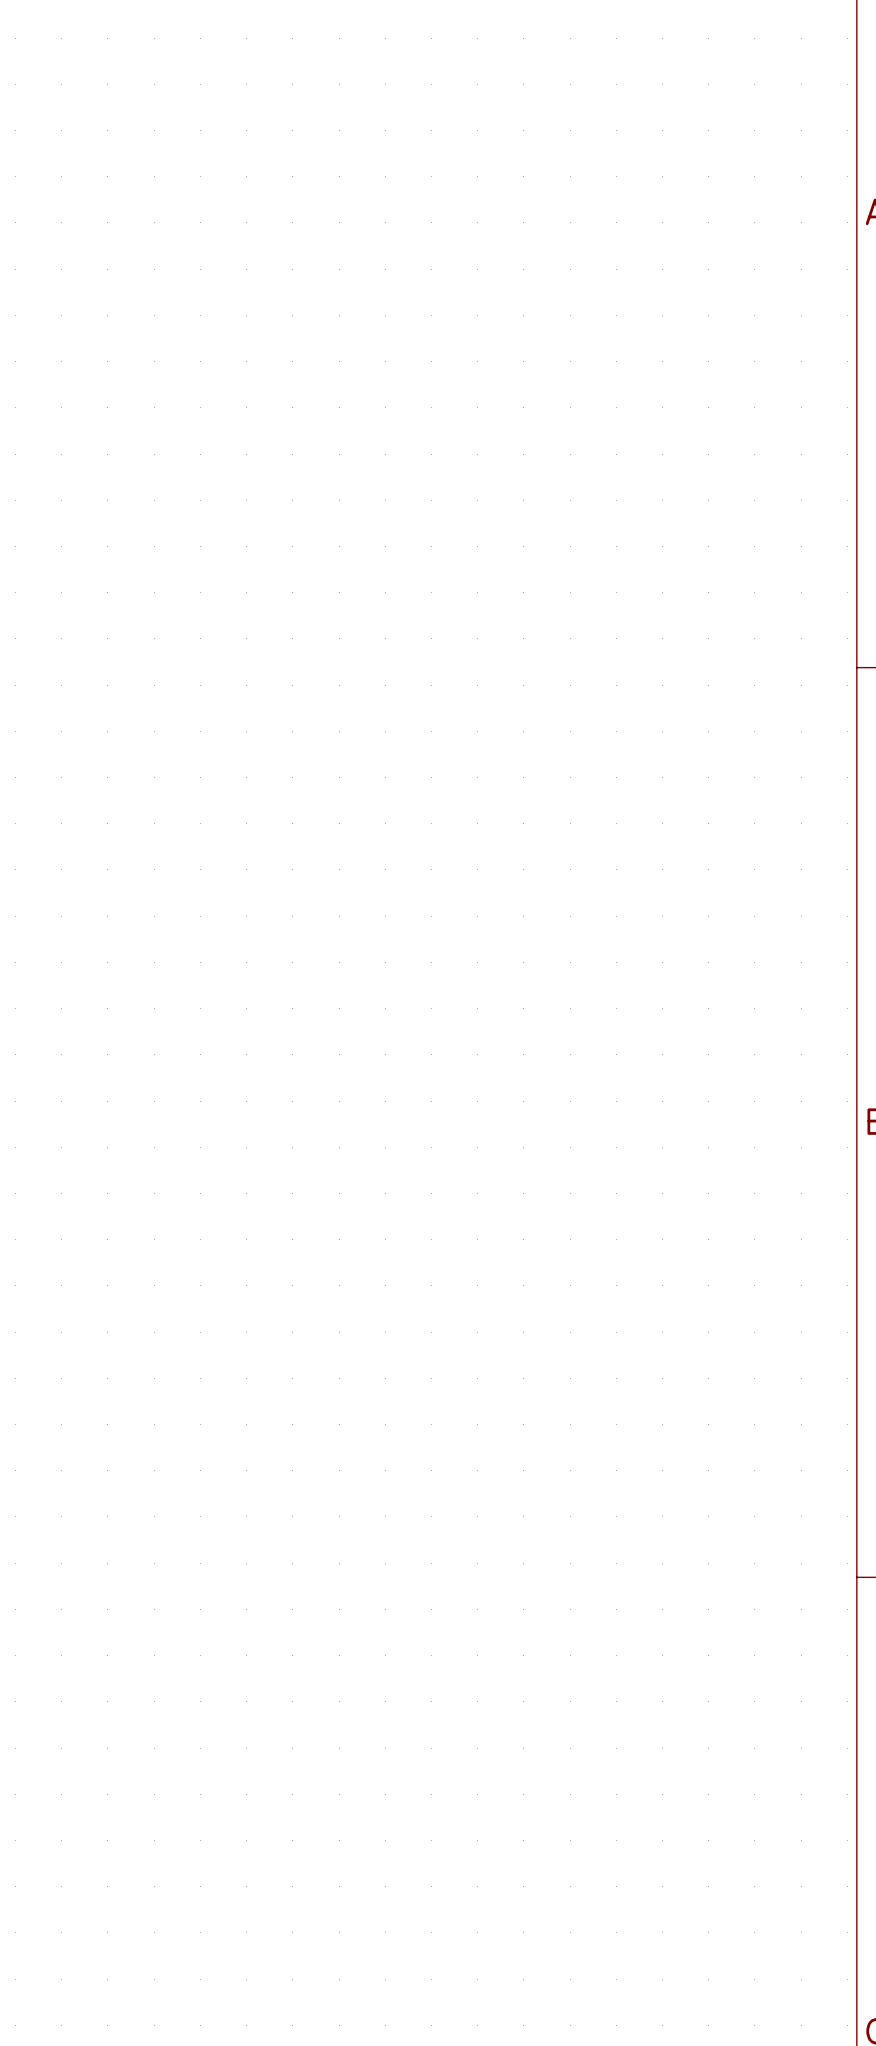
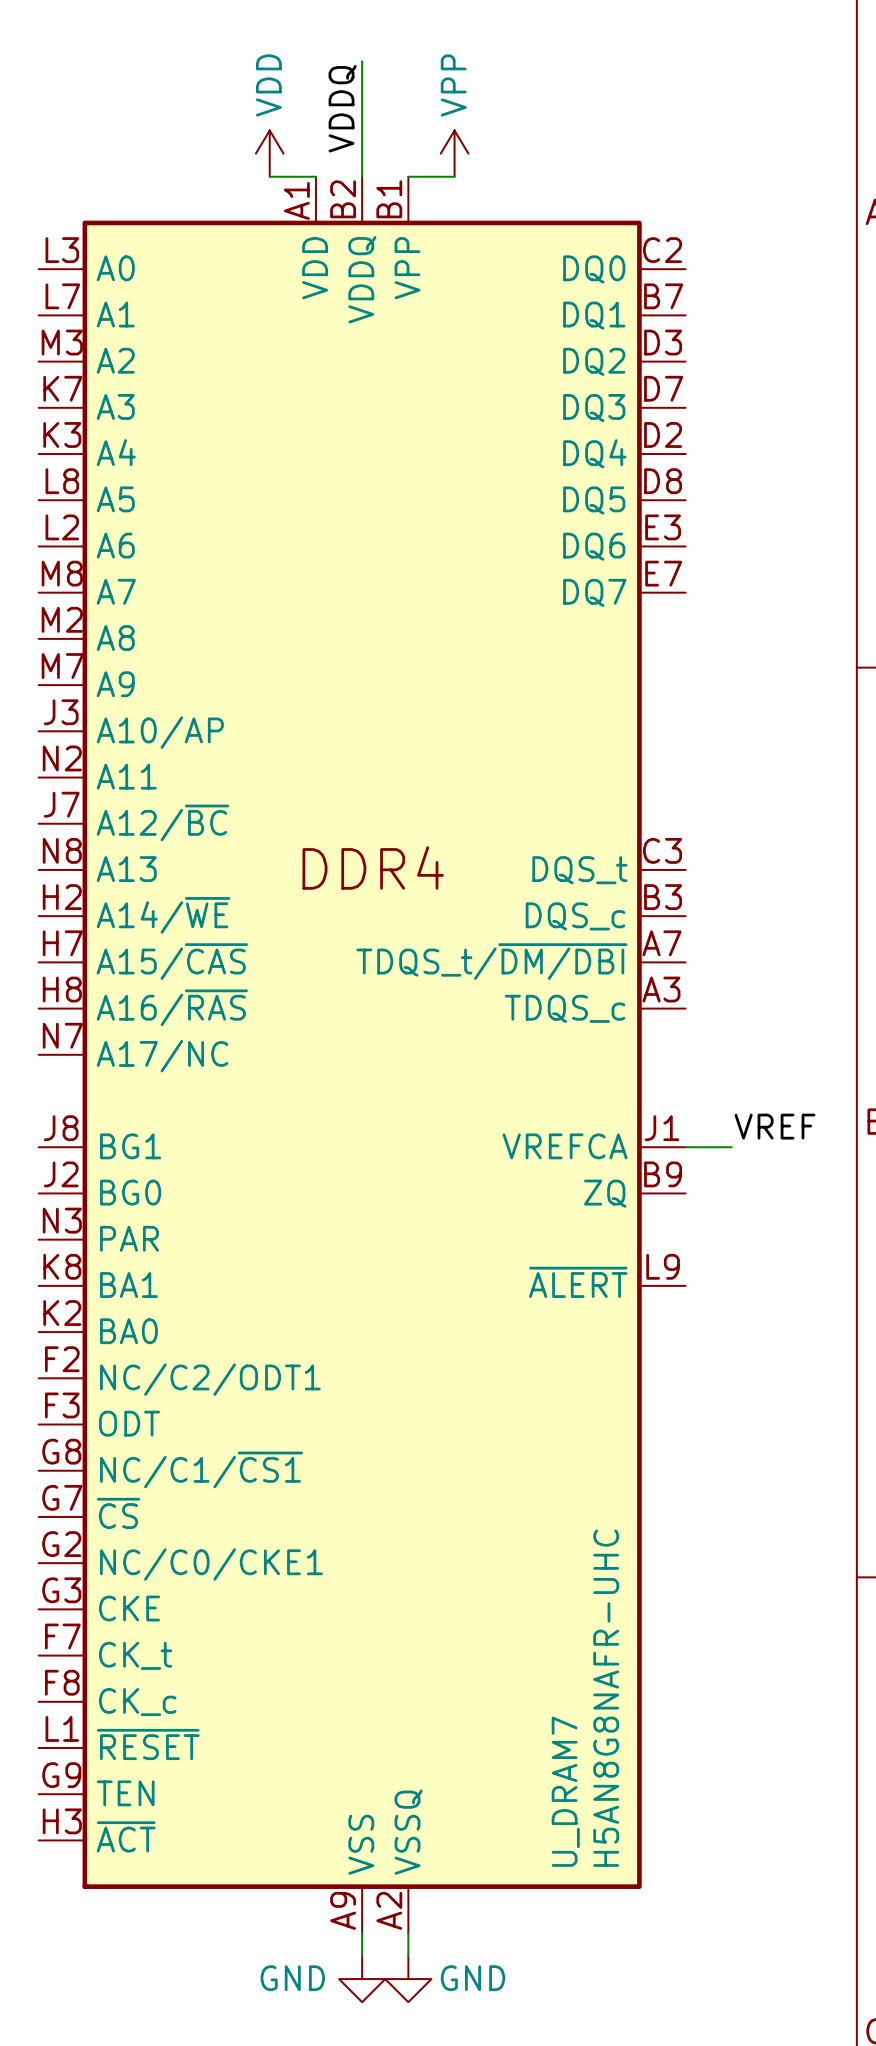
wire: none -> (362, 61) (362, 176)
label: none -> VDDQ (342, 108)
power symbol: none -> VDD (269, 153)
power symbol: none -> VPP (454, 153)
wire: none -> (269, 176) (315, 176)
wire: none -> (408, 176) (454, 176)
U_DRAM7: none -> H5AN8G8NAFR-UHC (362, 1054)
label: none -> VREF (774, 1126)
wire: none -> (685, 1147) (731, 1147)
wire: none -> (362, 1932) (362, 1955)
wire: none -> (408, 1932) (408, 1955)
power symbol: none -> GND (362, 1979)
power symbol: none -> GND (408, 1979)

